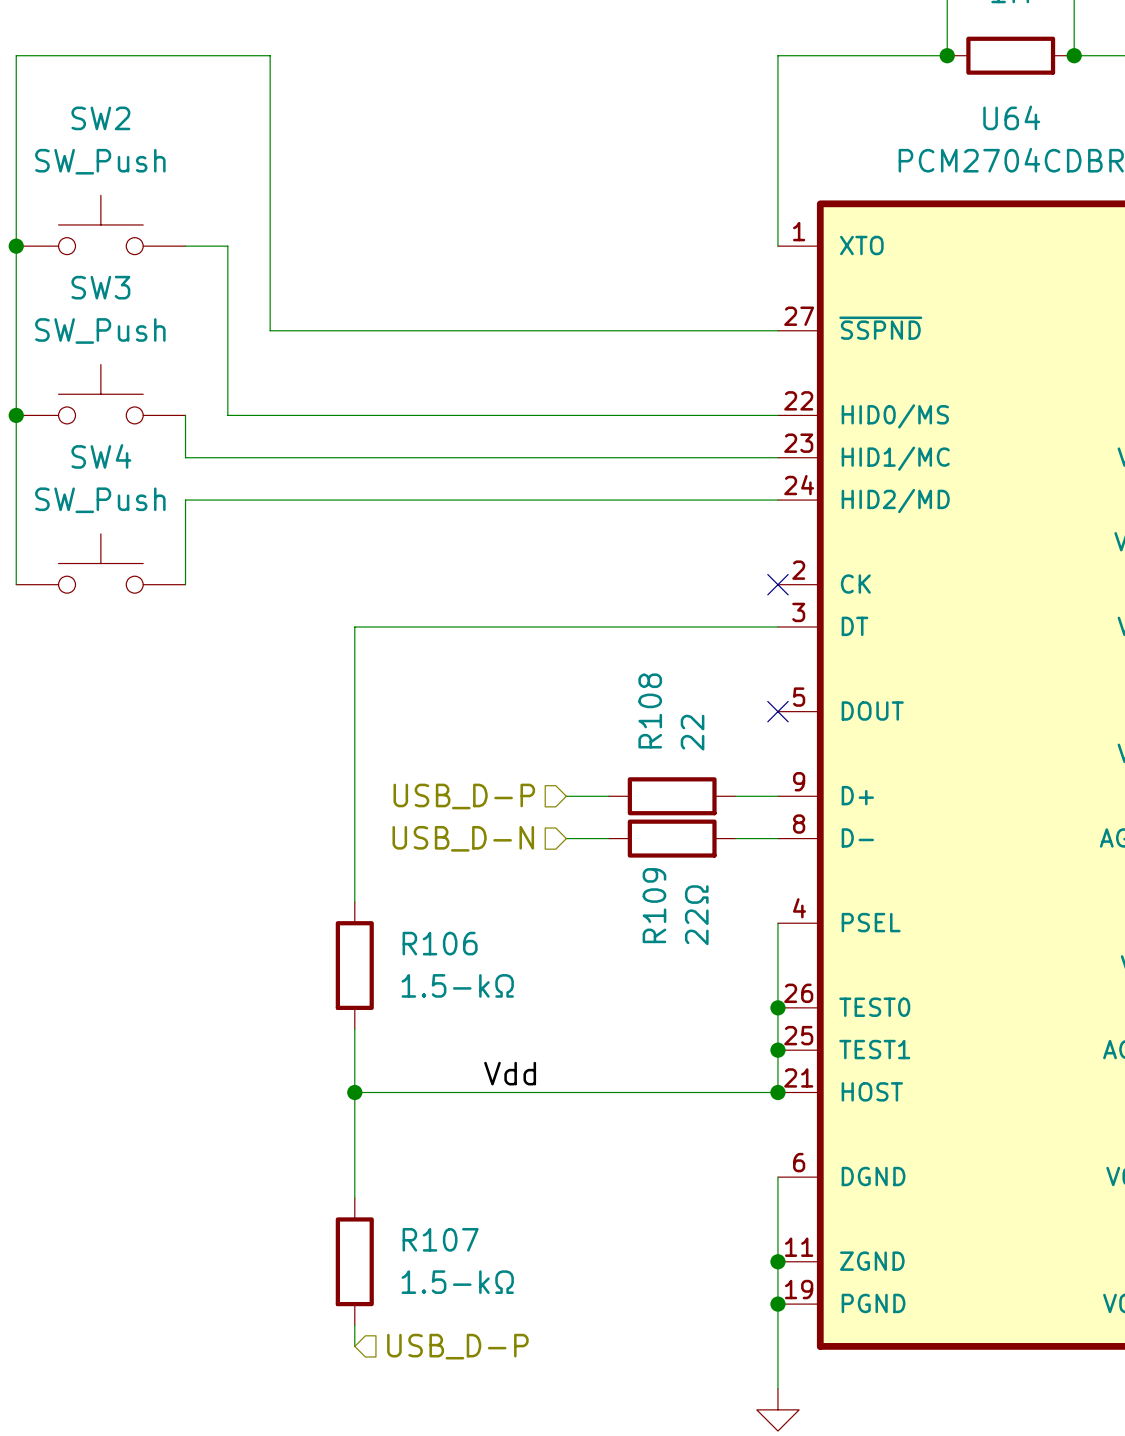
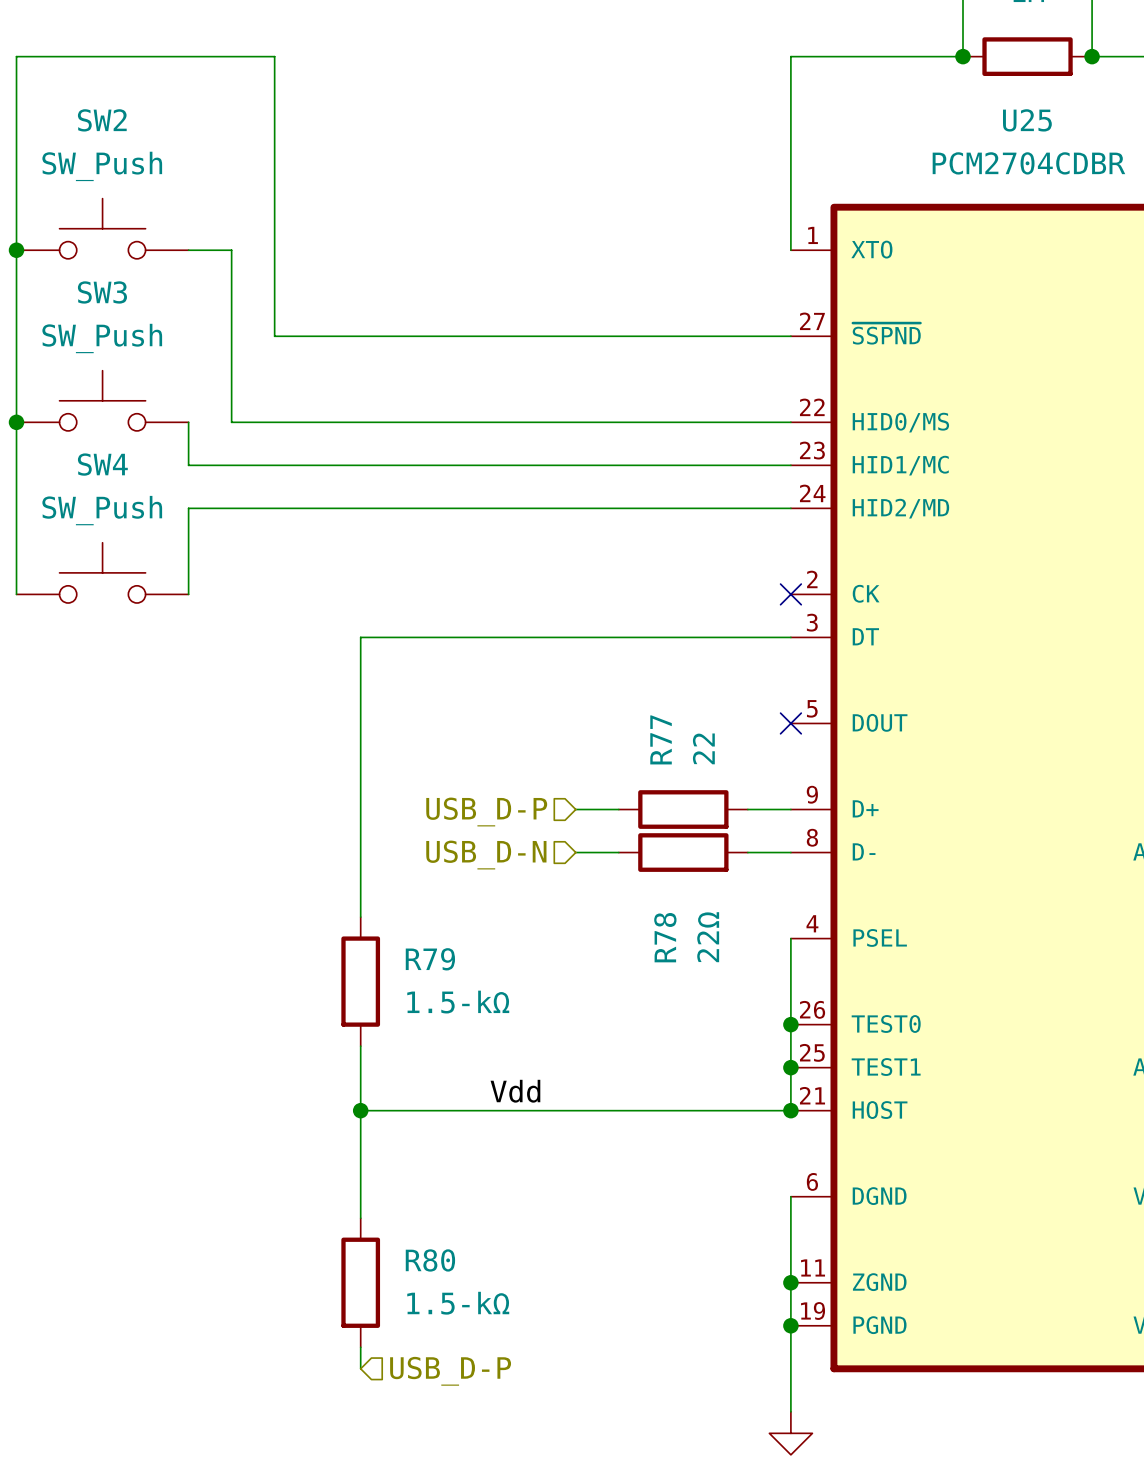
U64 name: U64 (1011, 117) -> U25 (1027, 120)
R108 name: R108 (650, 710) -> R77 (661, 739)
R109 name: R109 (654, 905) -> R78 (665, 937)
R106 name: R106 (440, 943) -> R79 (430, 959)
R107 name: R107 (440, 1239) -> R80 (430, 1260)

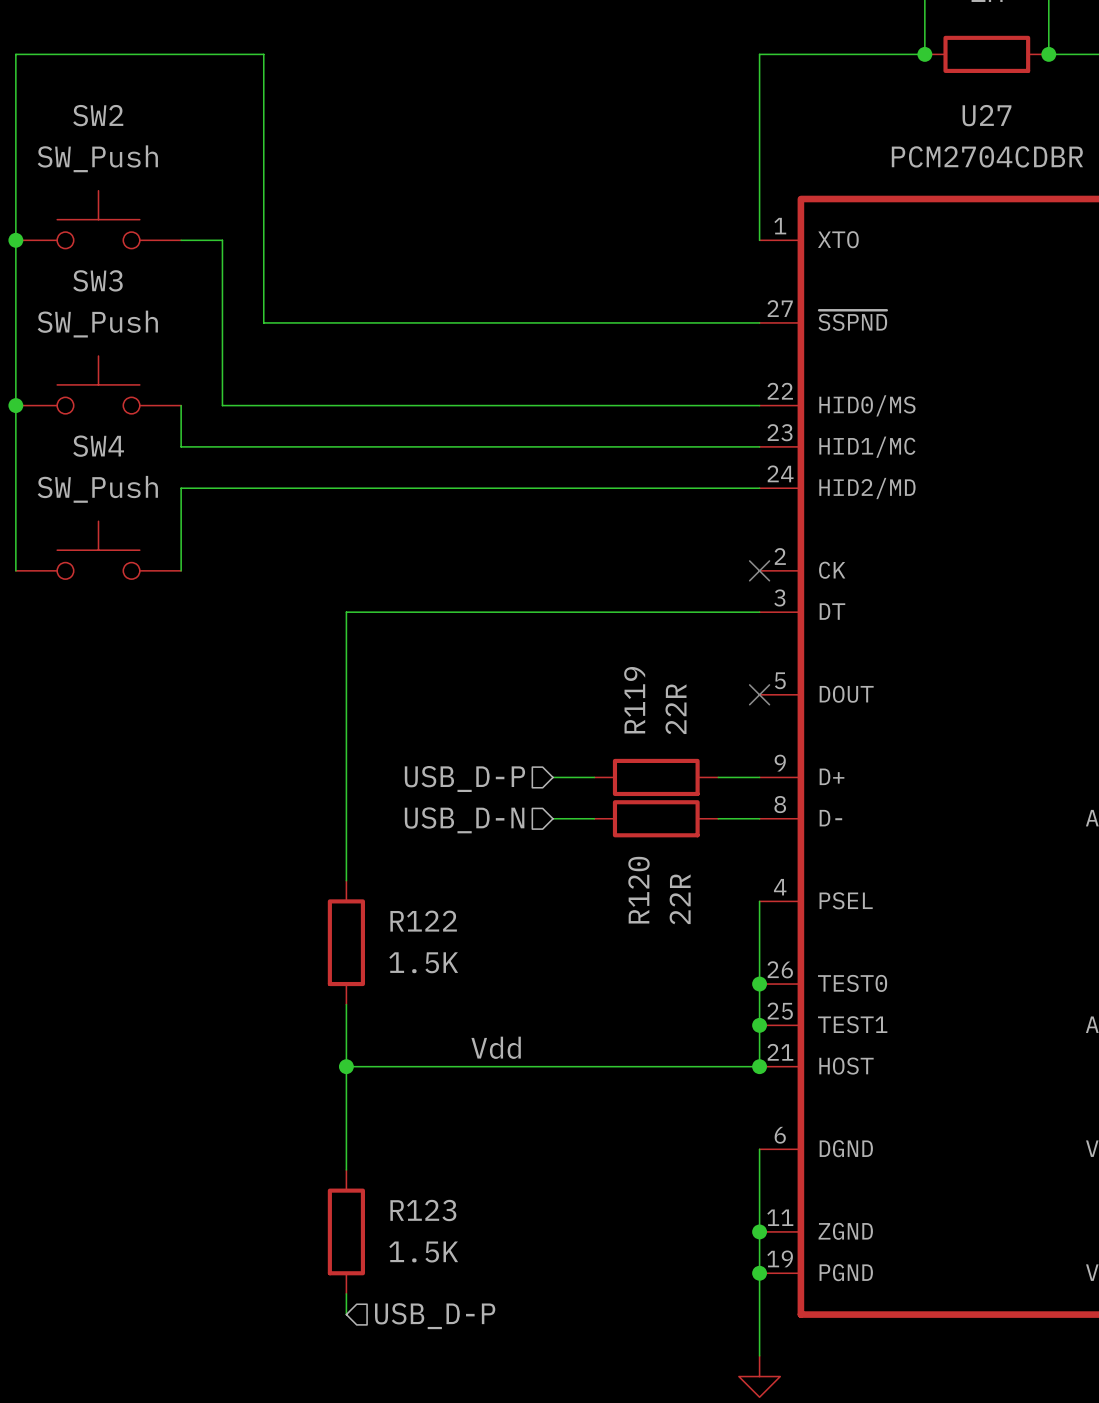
U25 name: U25 (1027, 120) -> U27 (986, 115)
R77 name: R77 (661, 739) -> R119 (634, 700)
R77 value: 22 (703, 748) -> 22R (675, 709)
R78 name: R78 (665, 937) -> R120 (638, 890)
R78 value: 22Ω (708, 937) -> 22R (680, 899)
R79 name: R79 (430, 959) -> R122 (423, 921)
R79 value: 1.5-kΩ (458, 1002) -> 1.5K (423, 962)
R80 name: R80 (430, 1260) -> R123 (423, 1210)
R80 value: 1.5-kΩ (458, 1303) -> 1.5K (423, 1252)

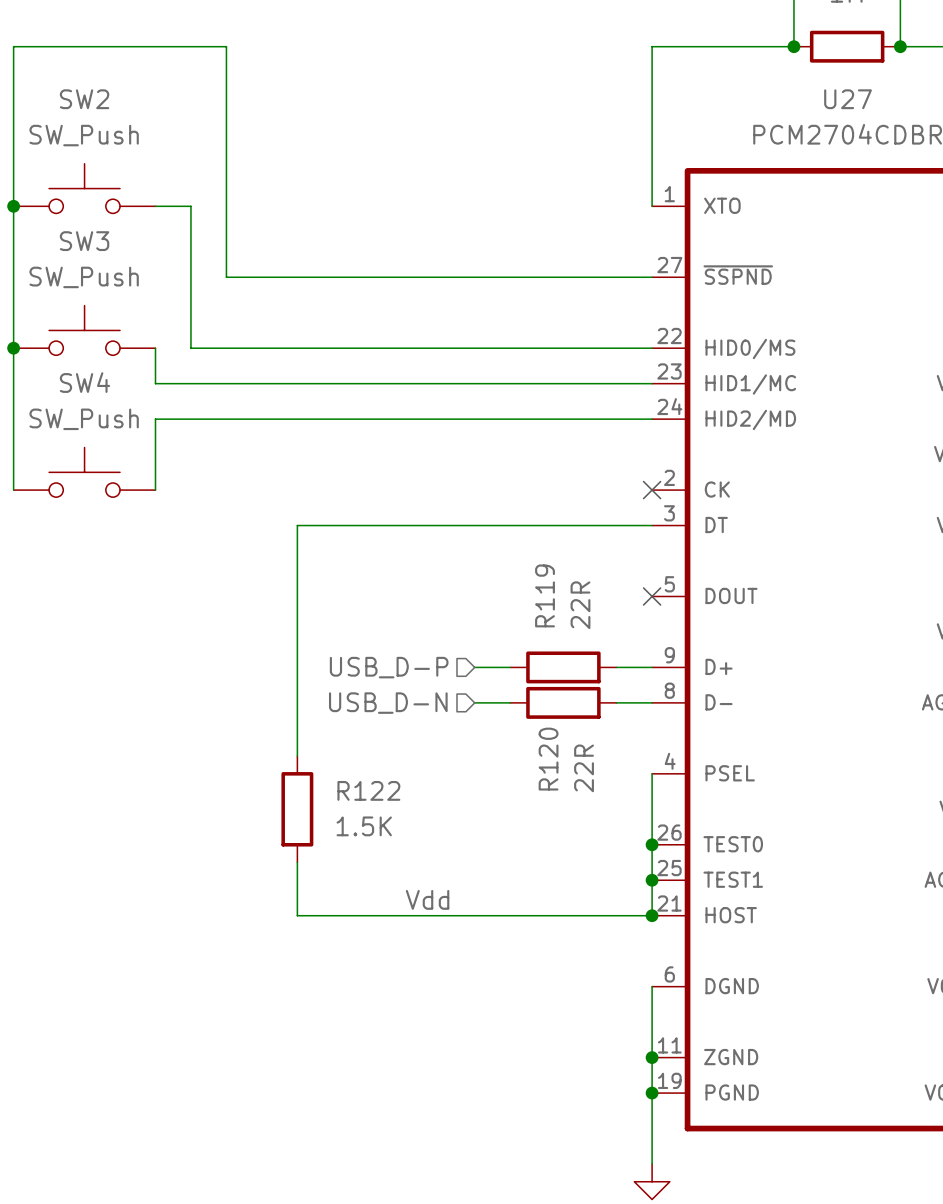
wire: (346, 1066) (346, 1169) -> none
junction: (346, 1066) -> none
R123: 1.5K (346, 1231) -> none
wire: (346, 1293) (346, 1314) -> none
hierarchical label: USB_D-P (435, 1316) -> none

